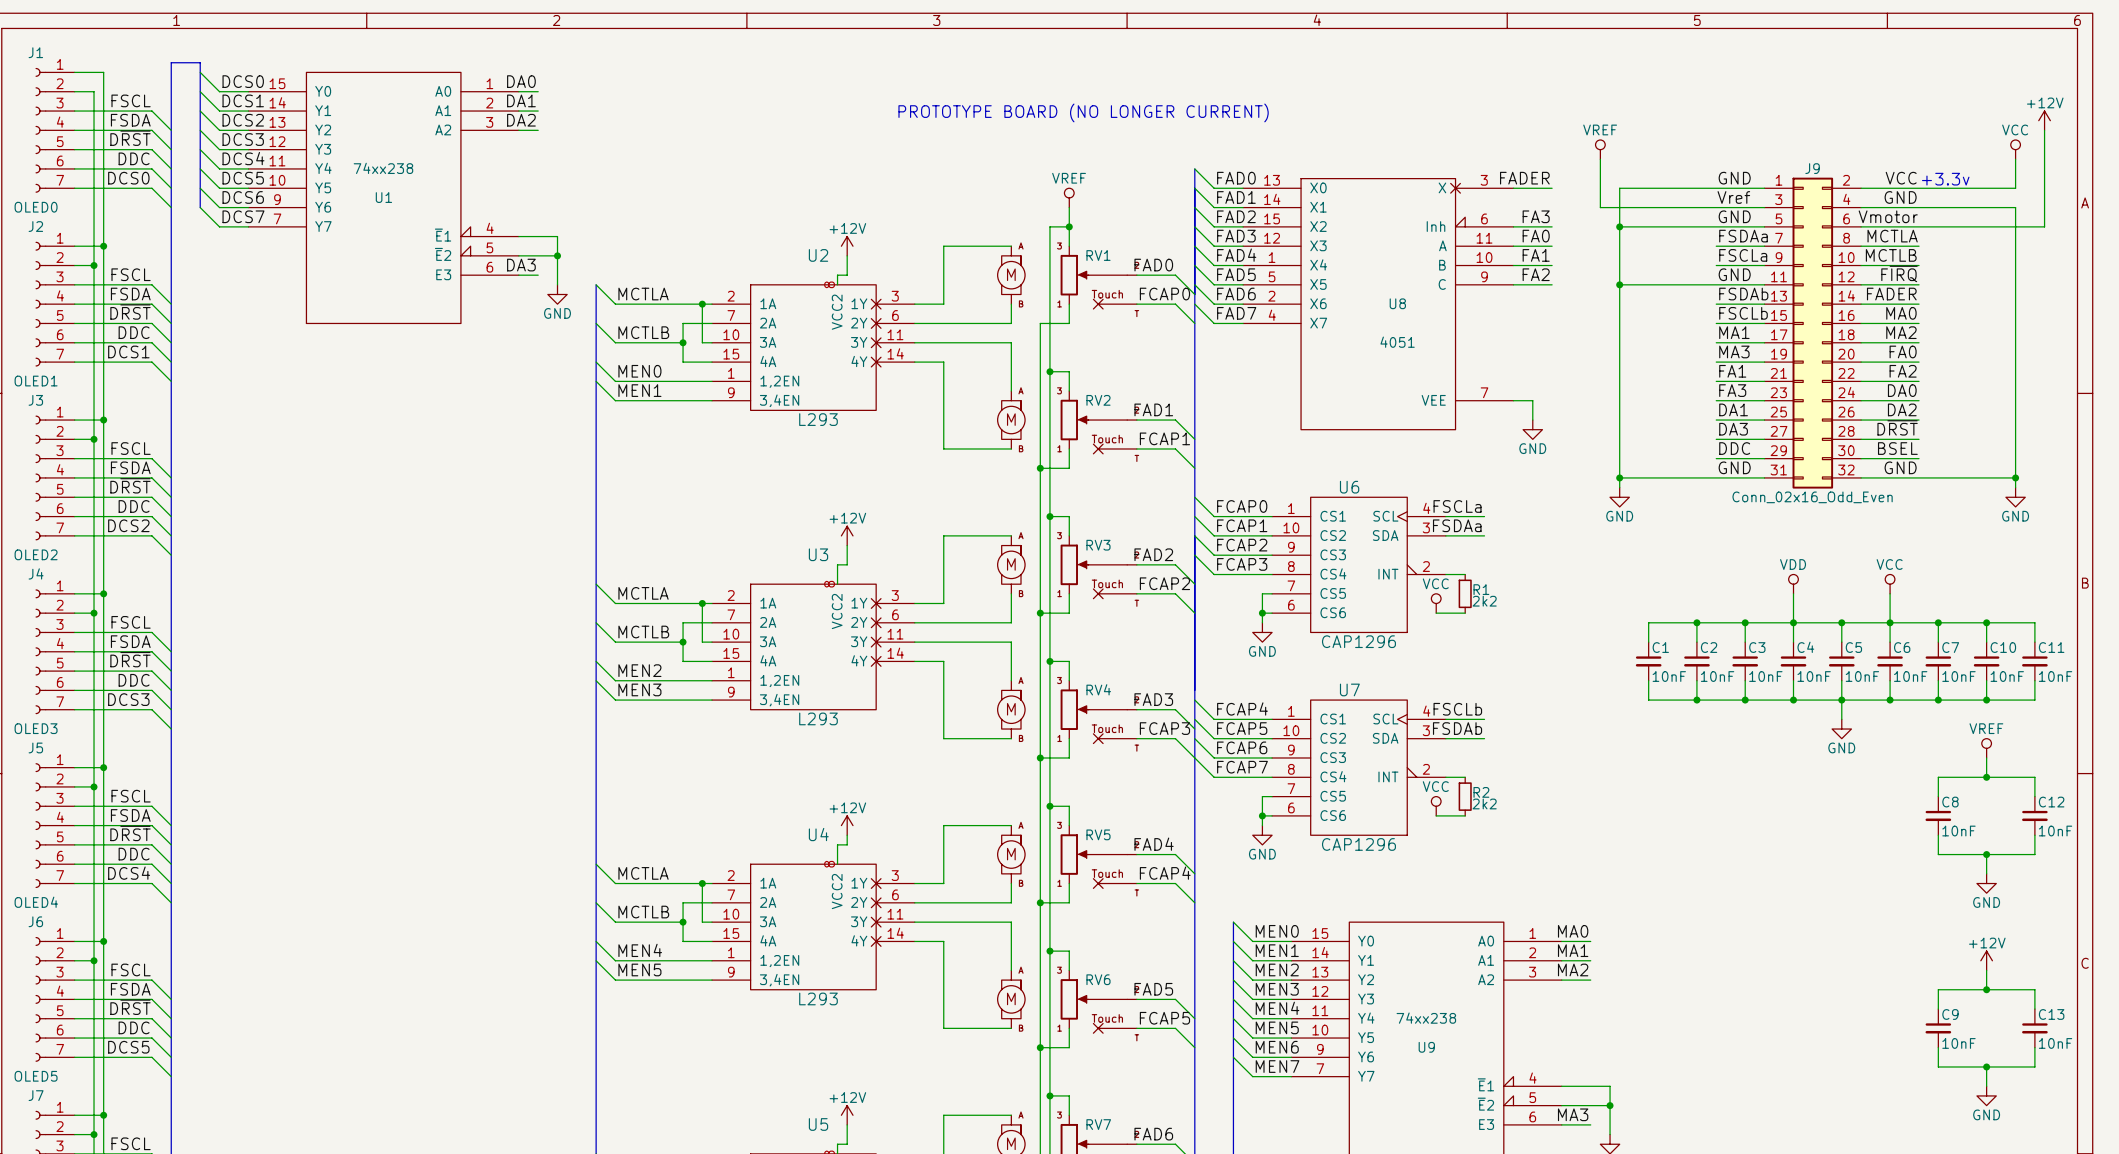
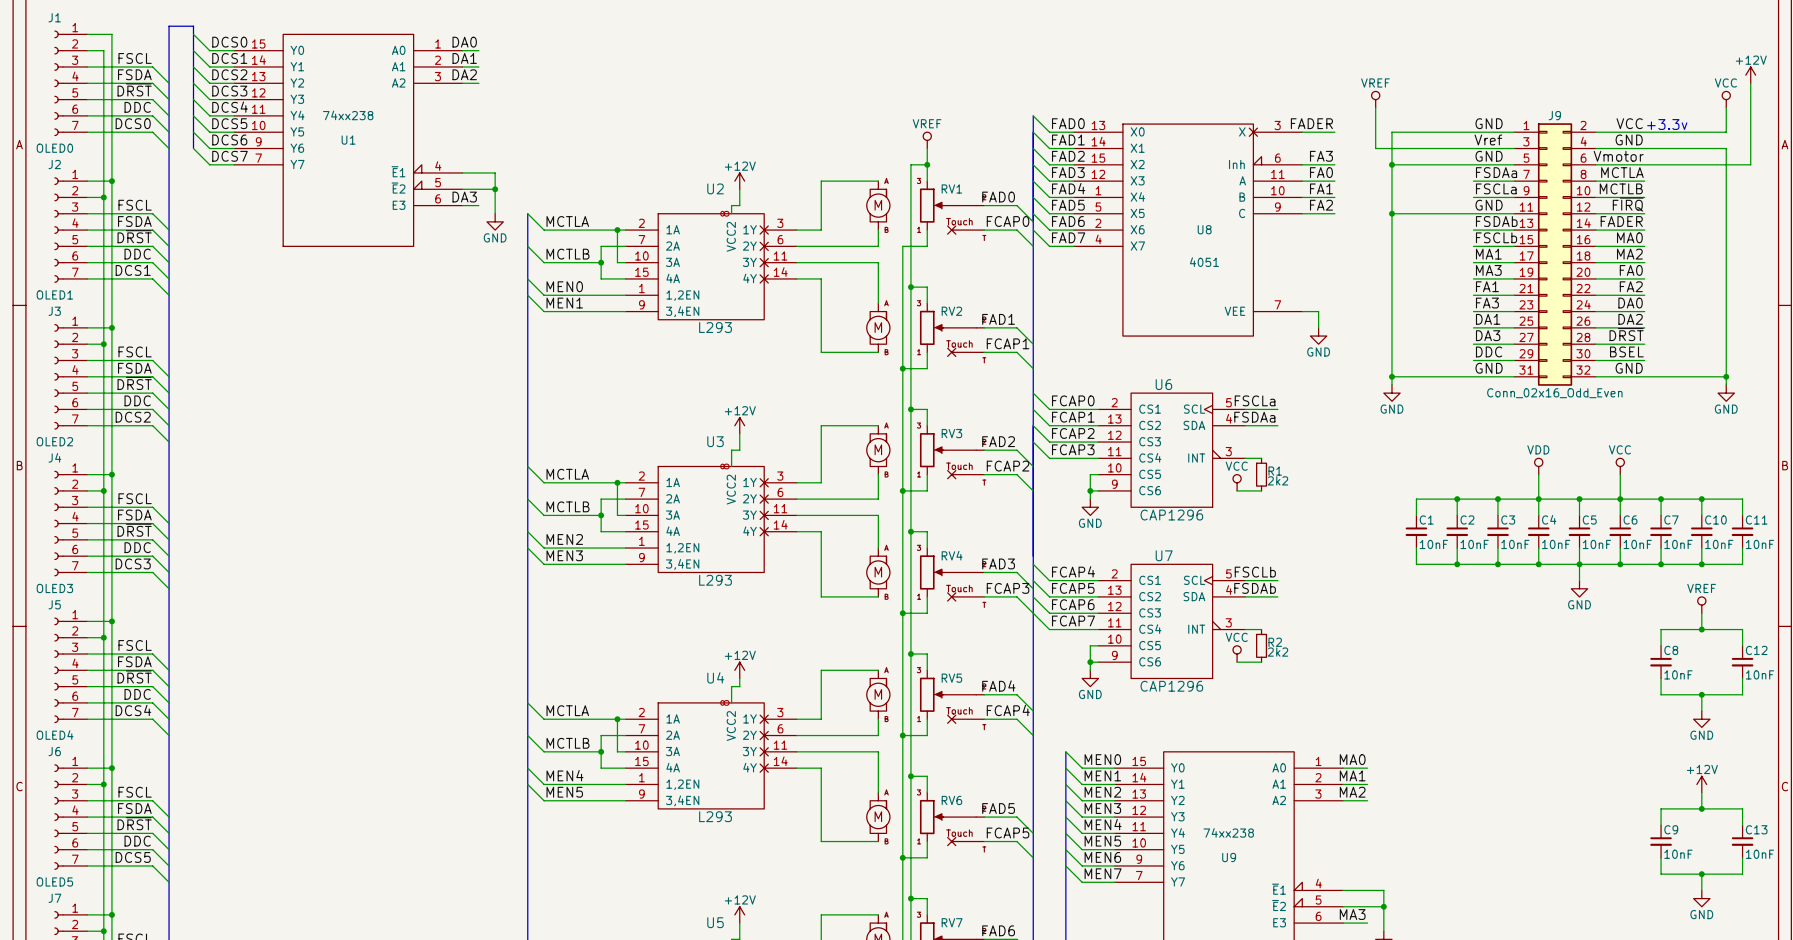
text: PROTOTYPE BOARD (NO LONGER CURRENT) (1083, 112) -> none
U6 symbol: [1272, 497, 1446, 633] -> [1098, 393, 1246, 508]
U7 symbol: [1272, 700, 1446, 836] -> [1098, 564, 1246, 679]

